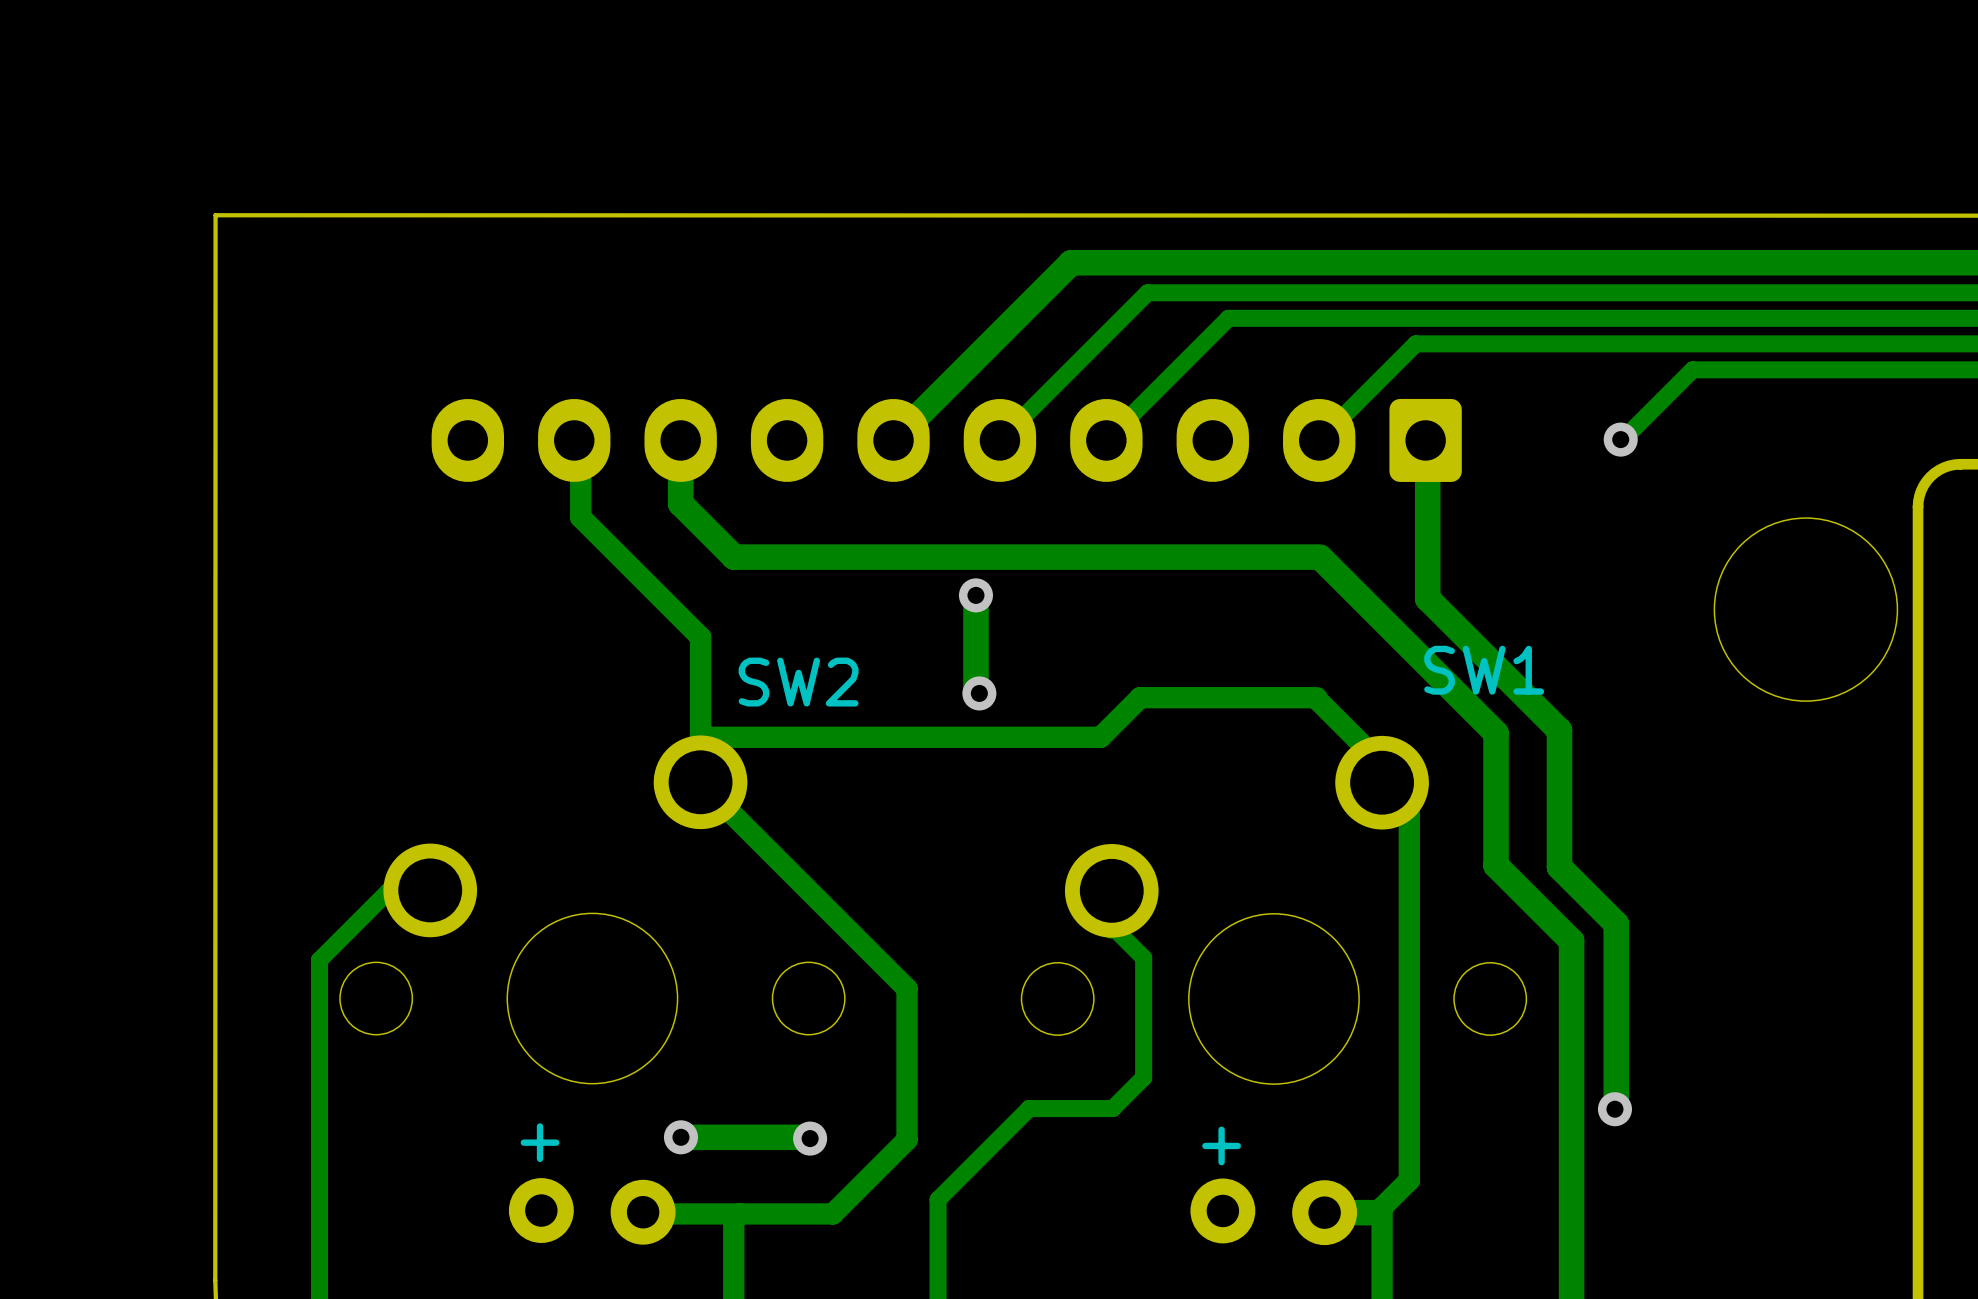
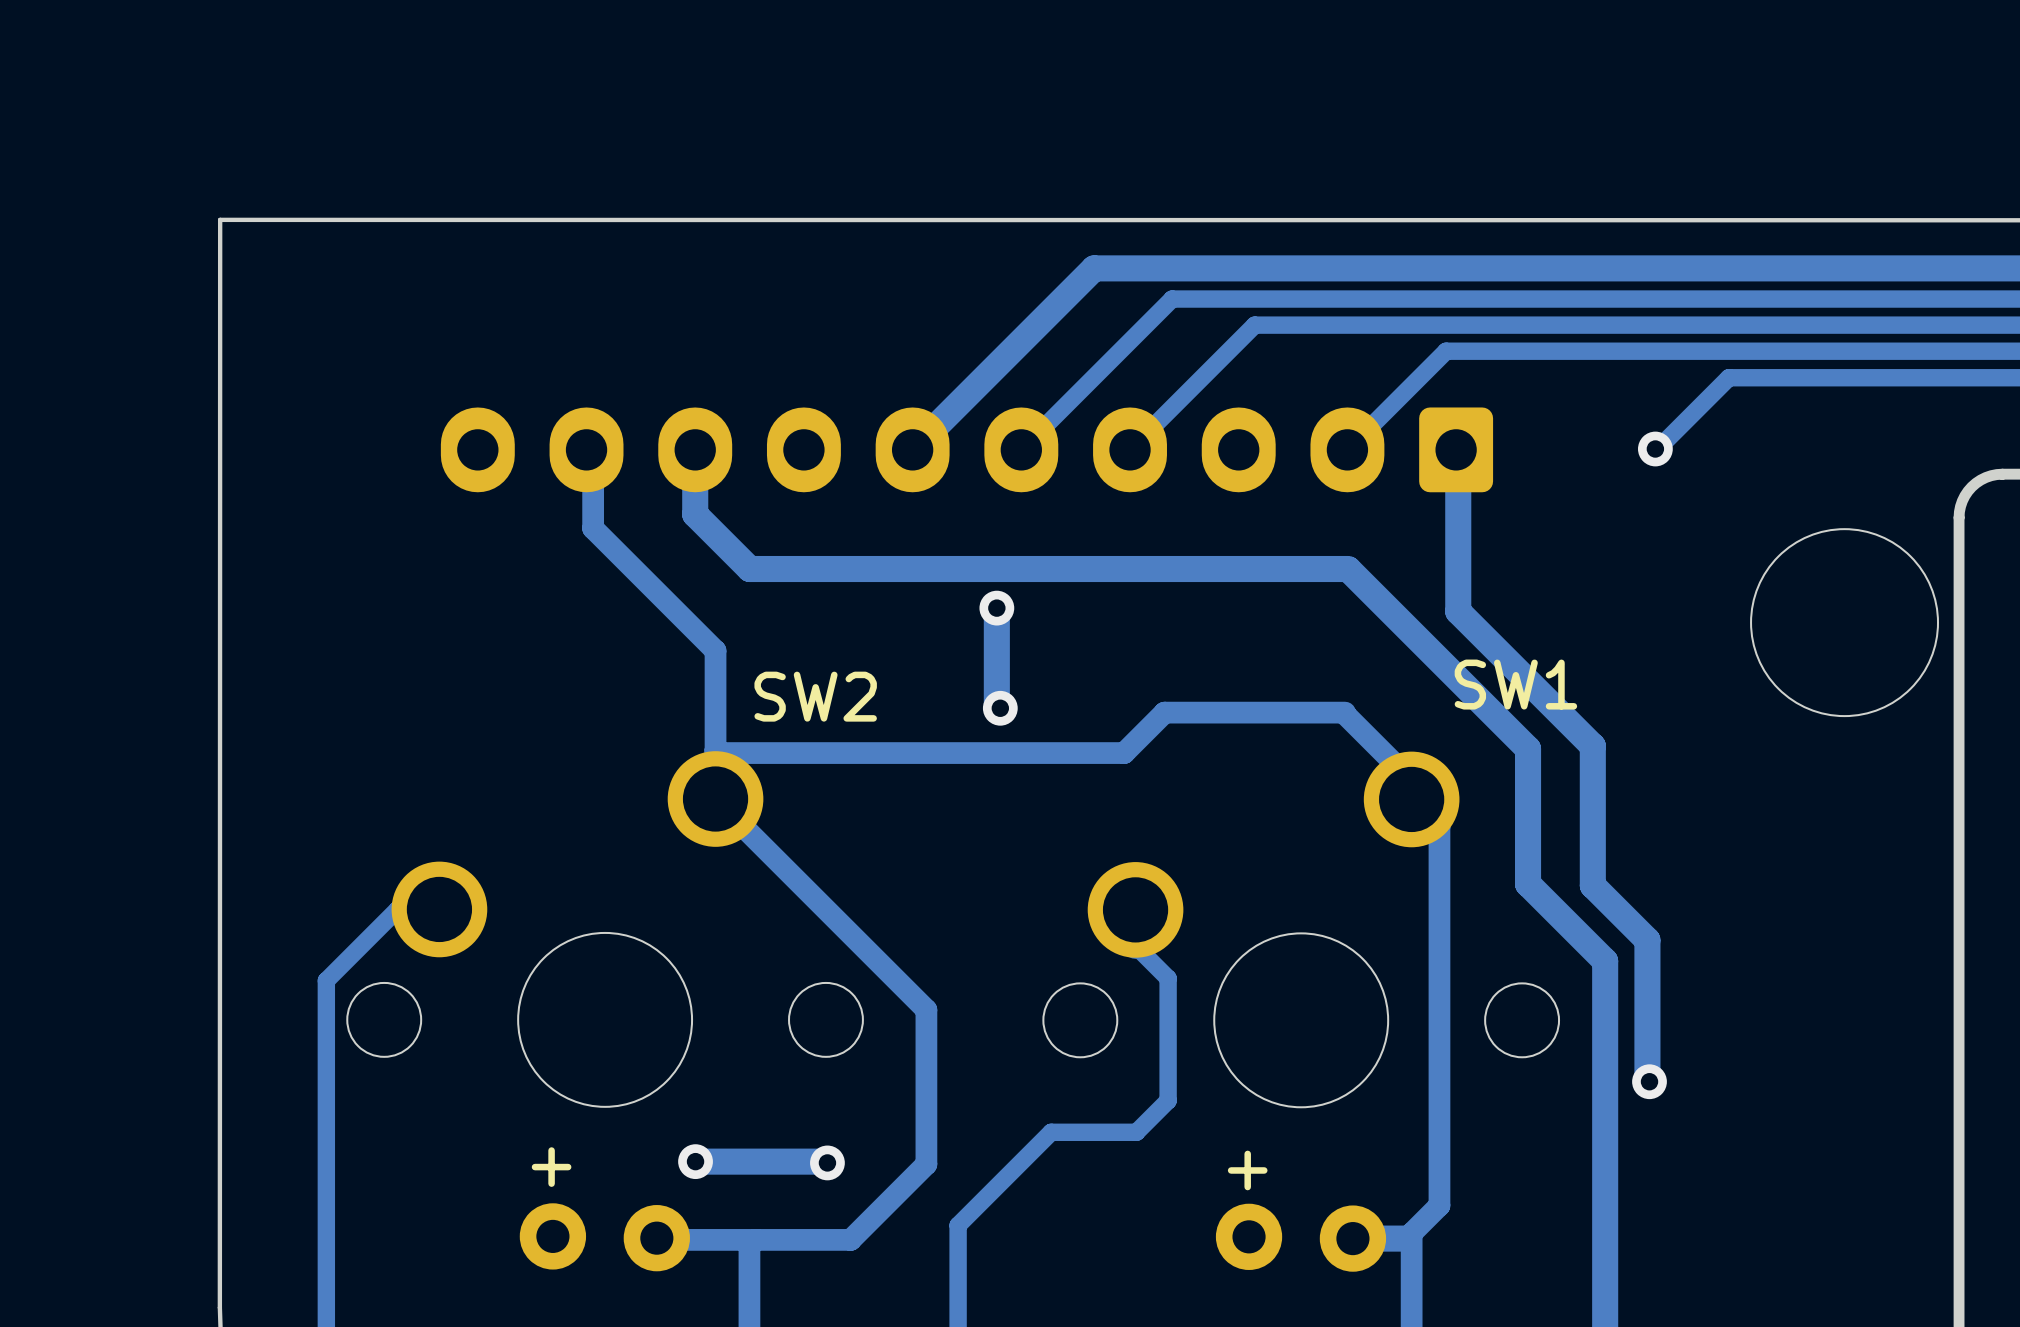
track: (1612, 920) (1616, 923) (1614, 1109) -> (1647, 940) (1647, 1079) (1649, 1081)
via position: (1614, 1109) -> (1649, 1081)

